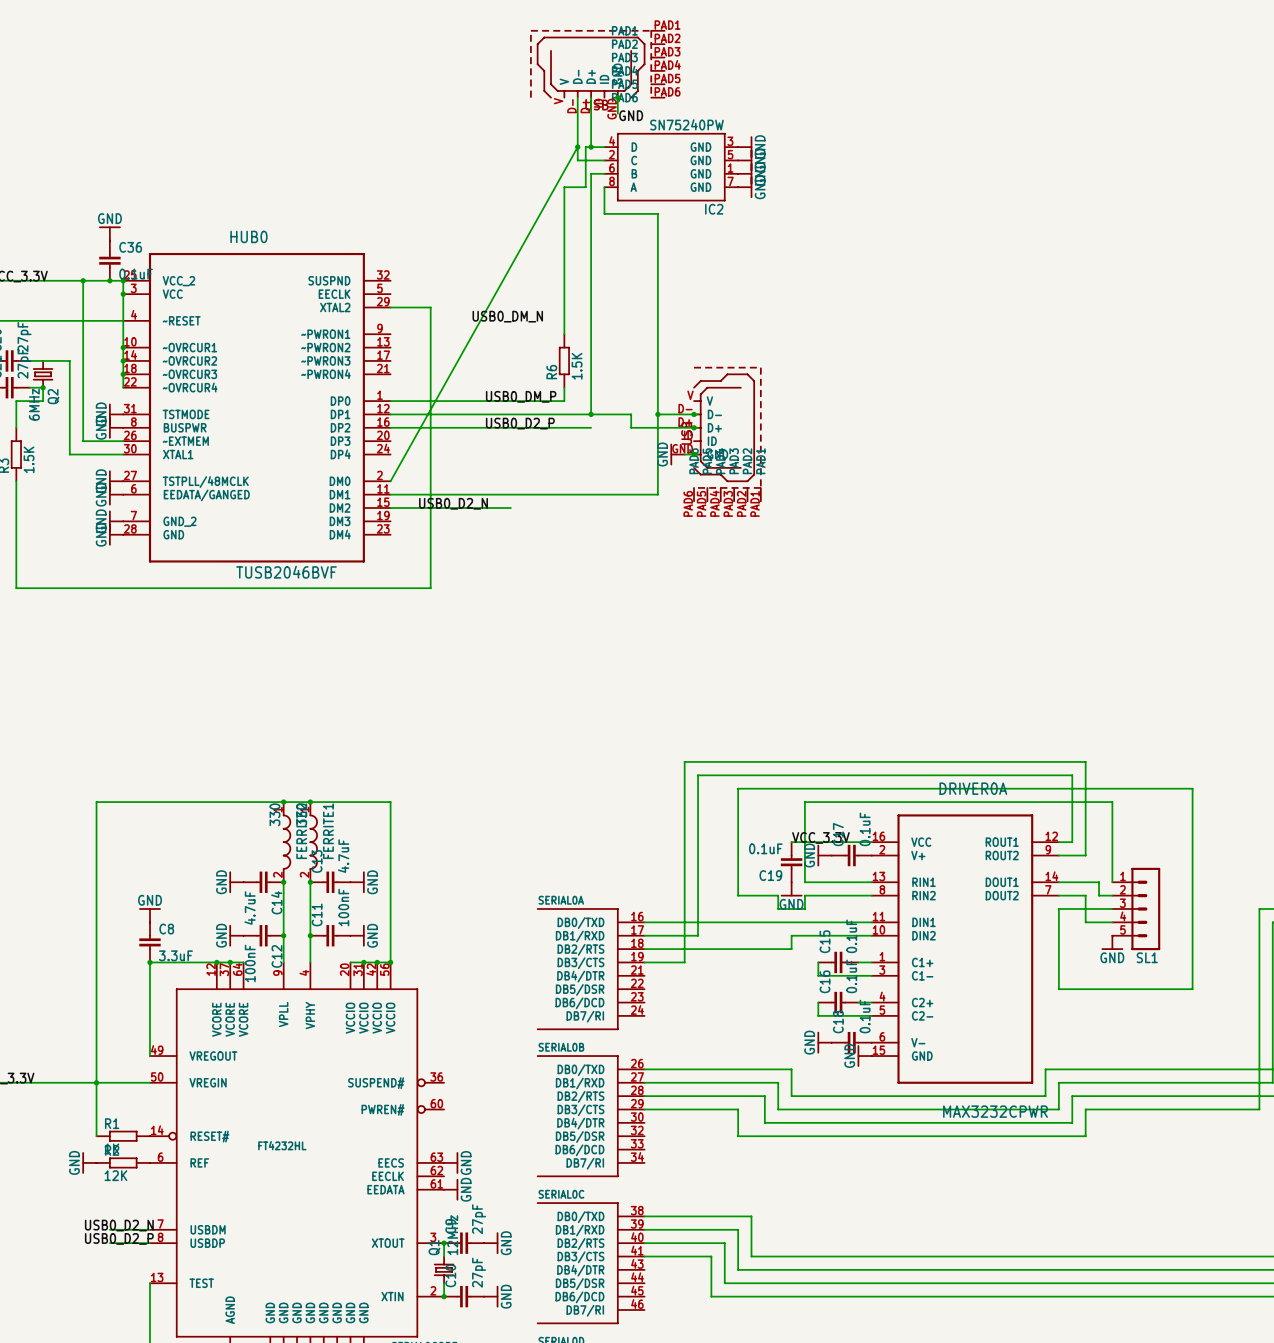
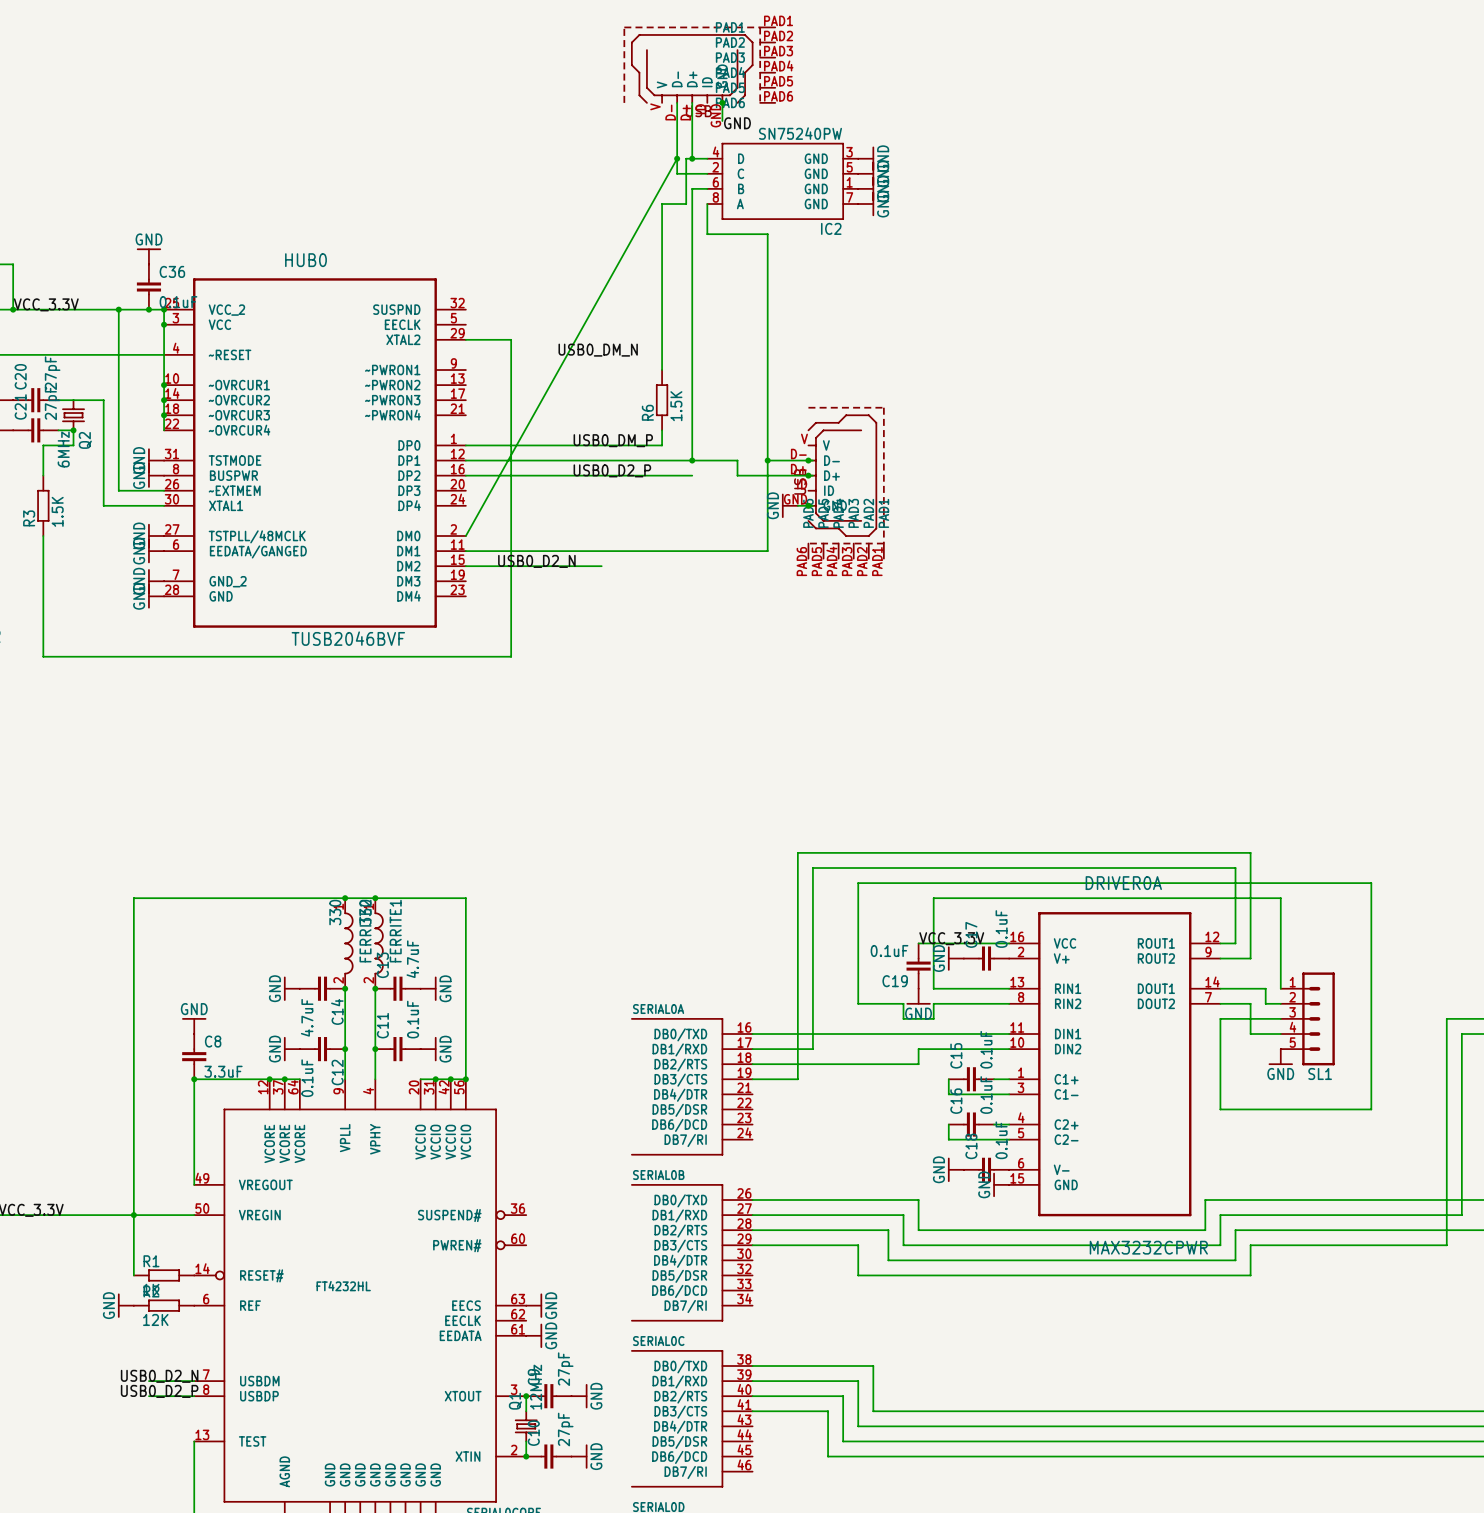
C11 value: 100nF (343, 907) -> 0.1uF (413, 1019)
C12 value: 100nF (250, 963) -> 0.1uF (307, 1078)

